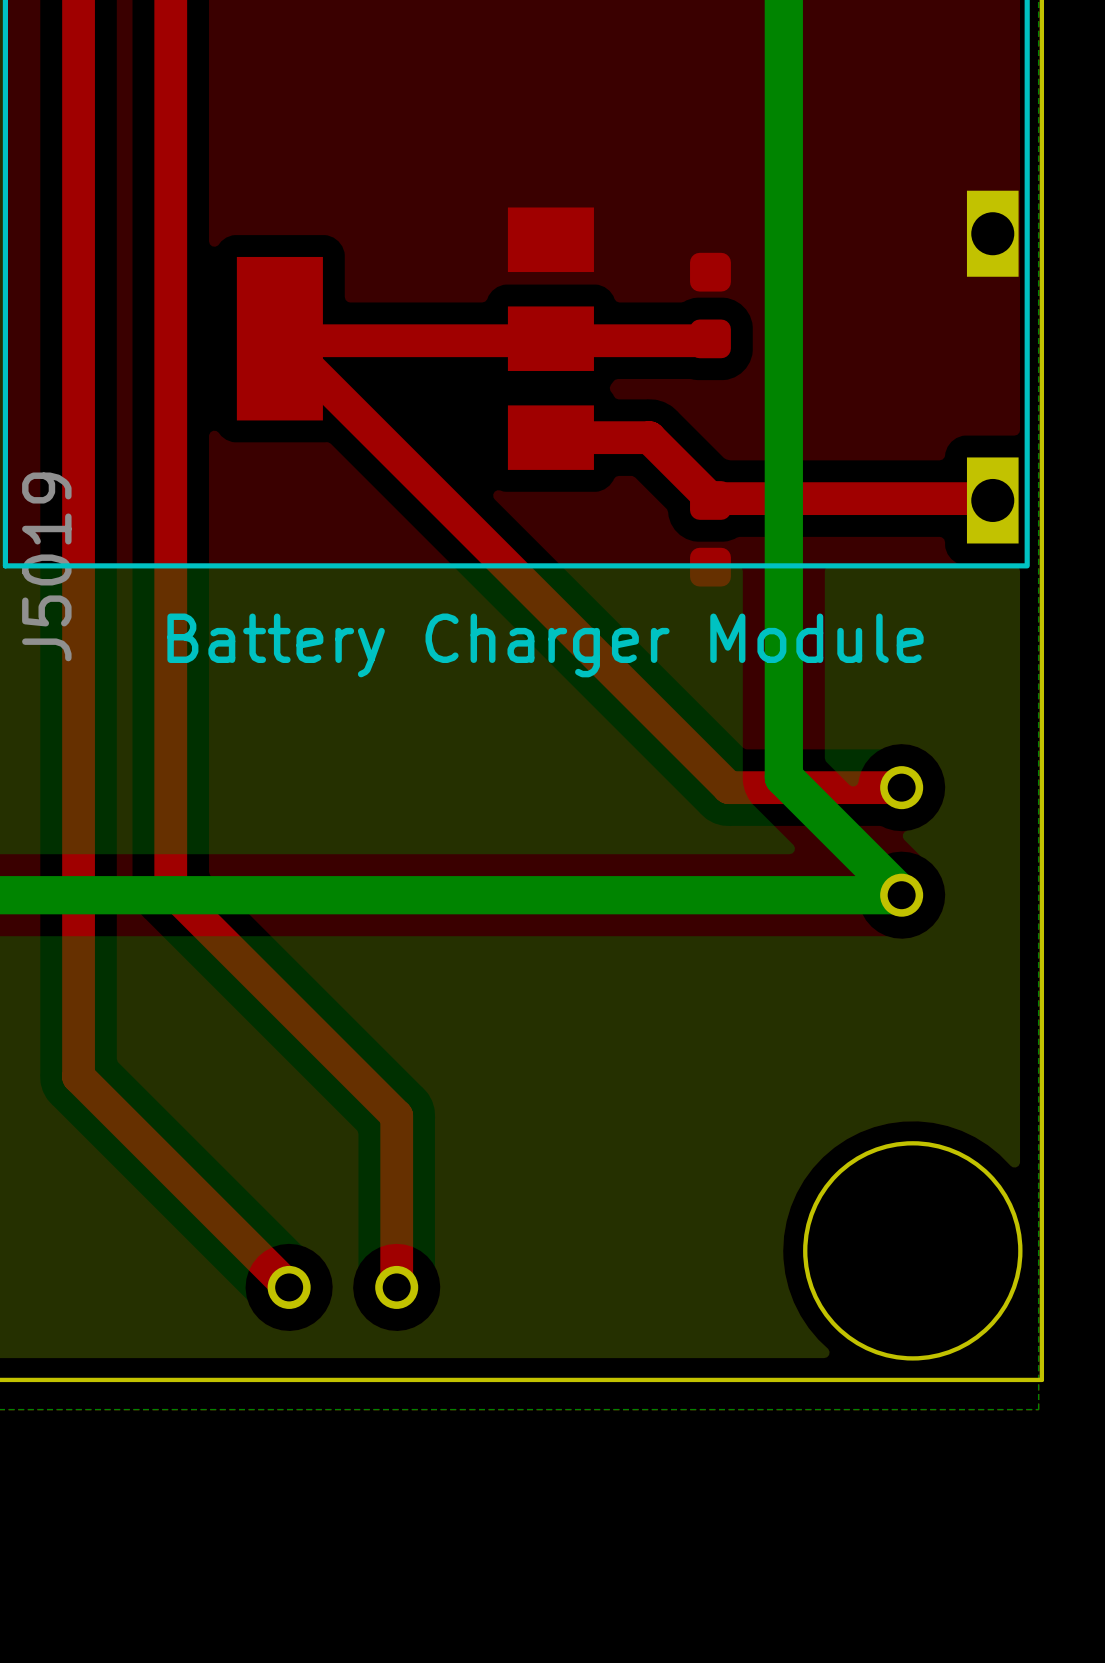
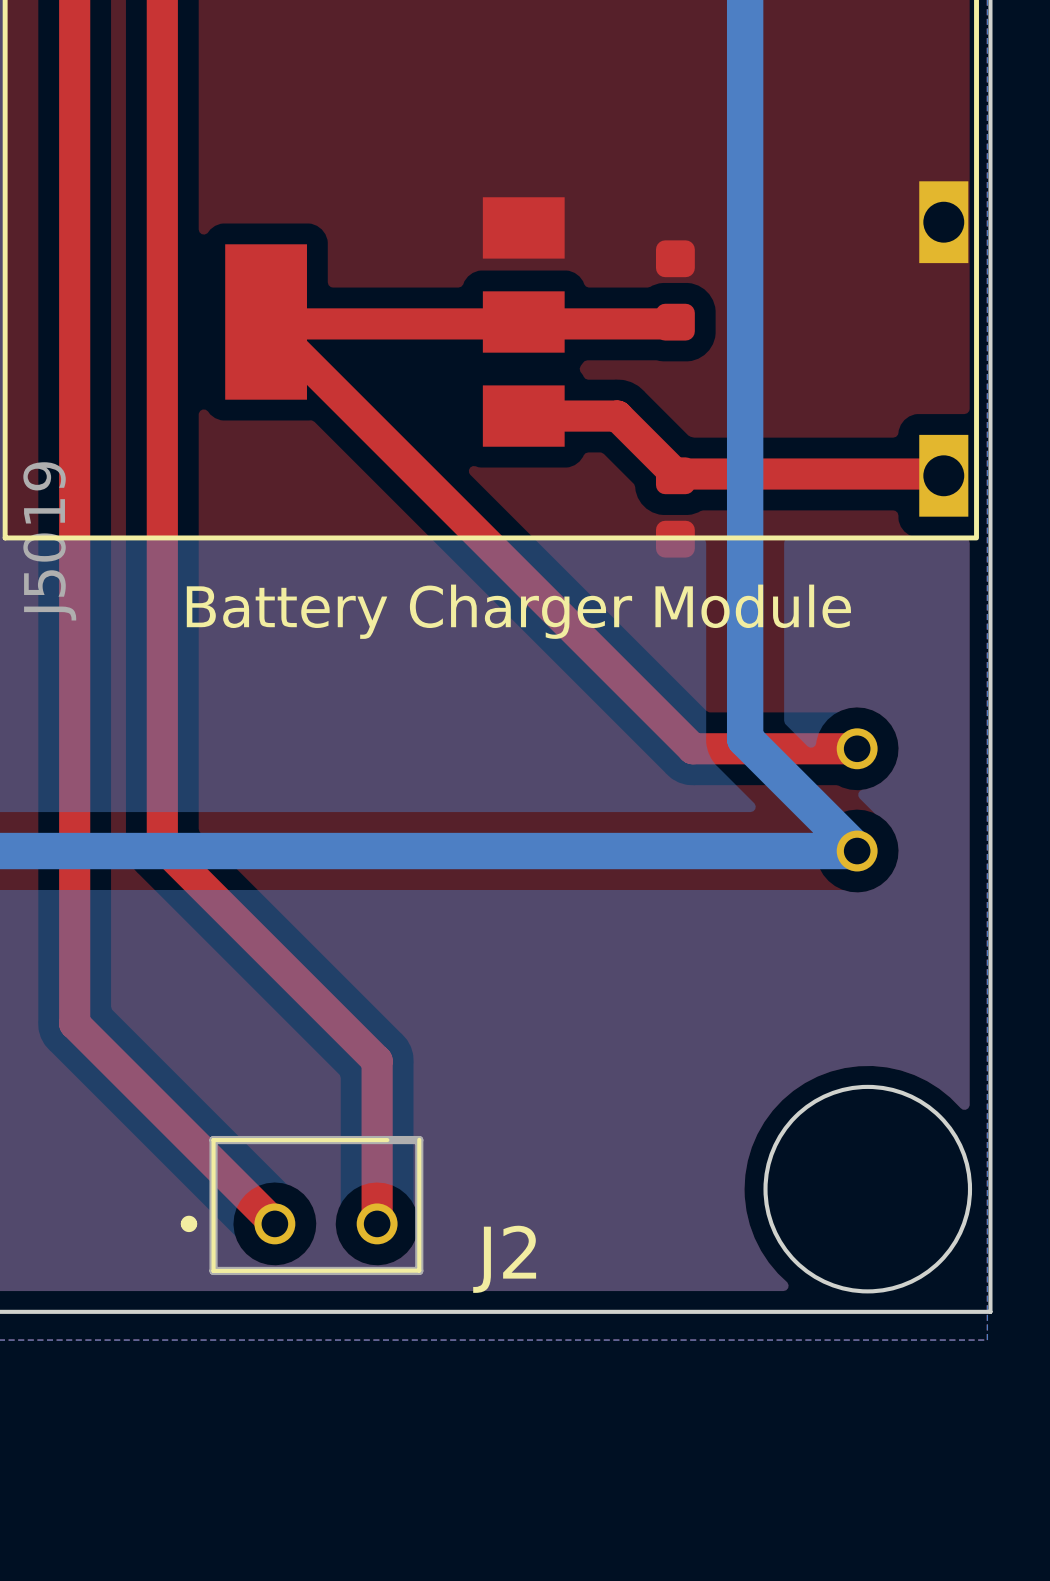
J2 side: top (342, 1287) -> bottom (302, 1205)

